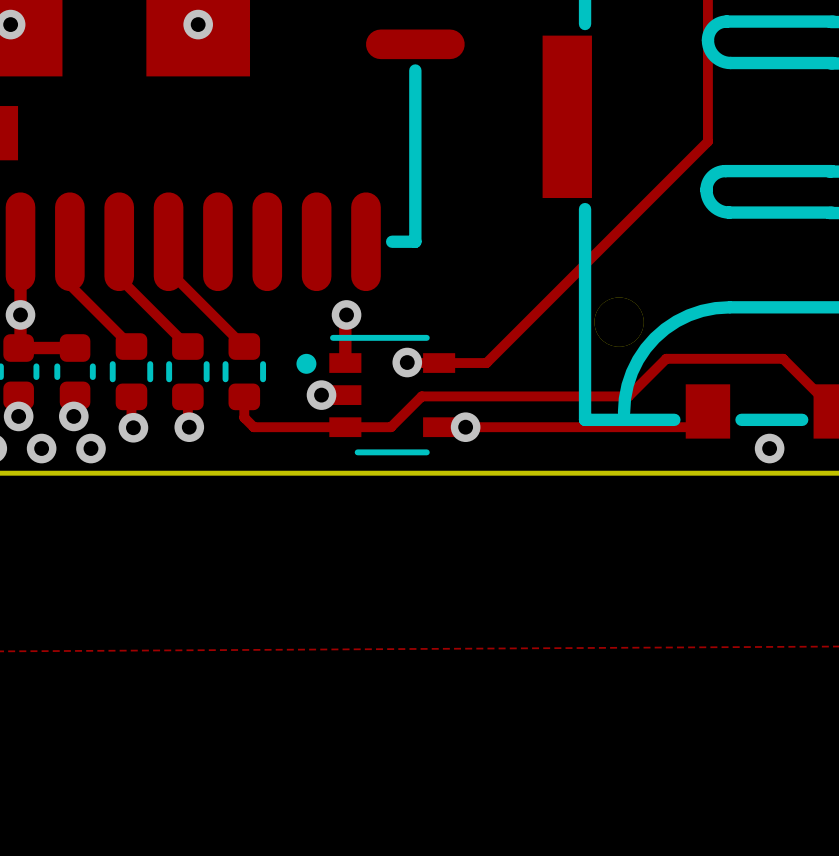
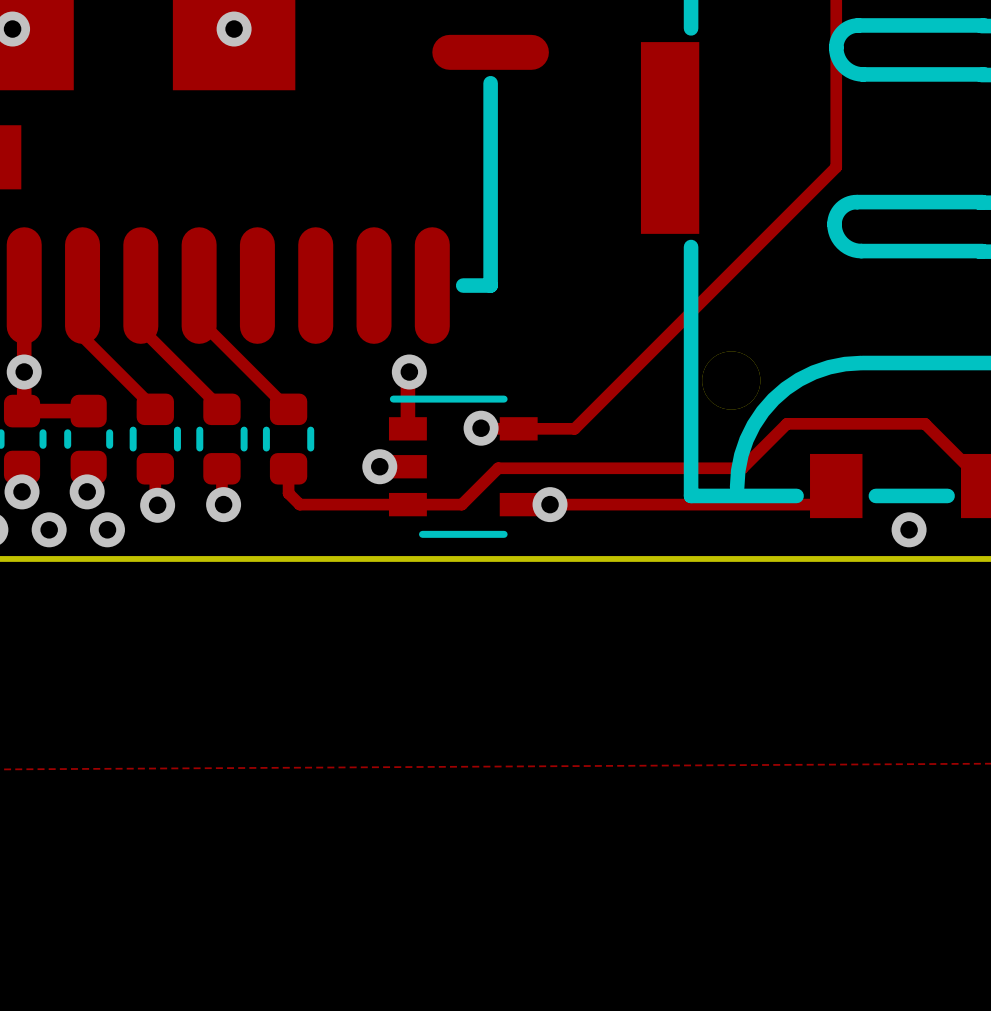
drawing: [296, 353, 317, 374] -> none

